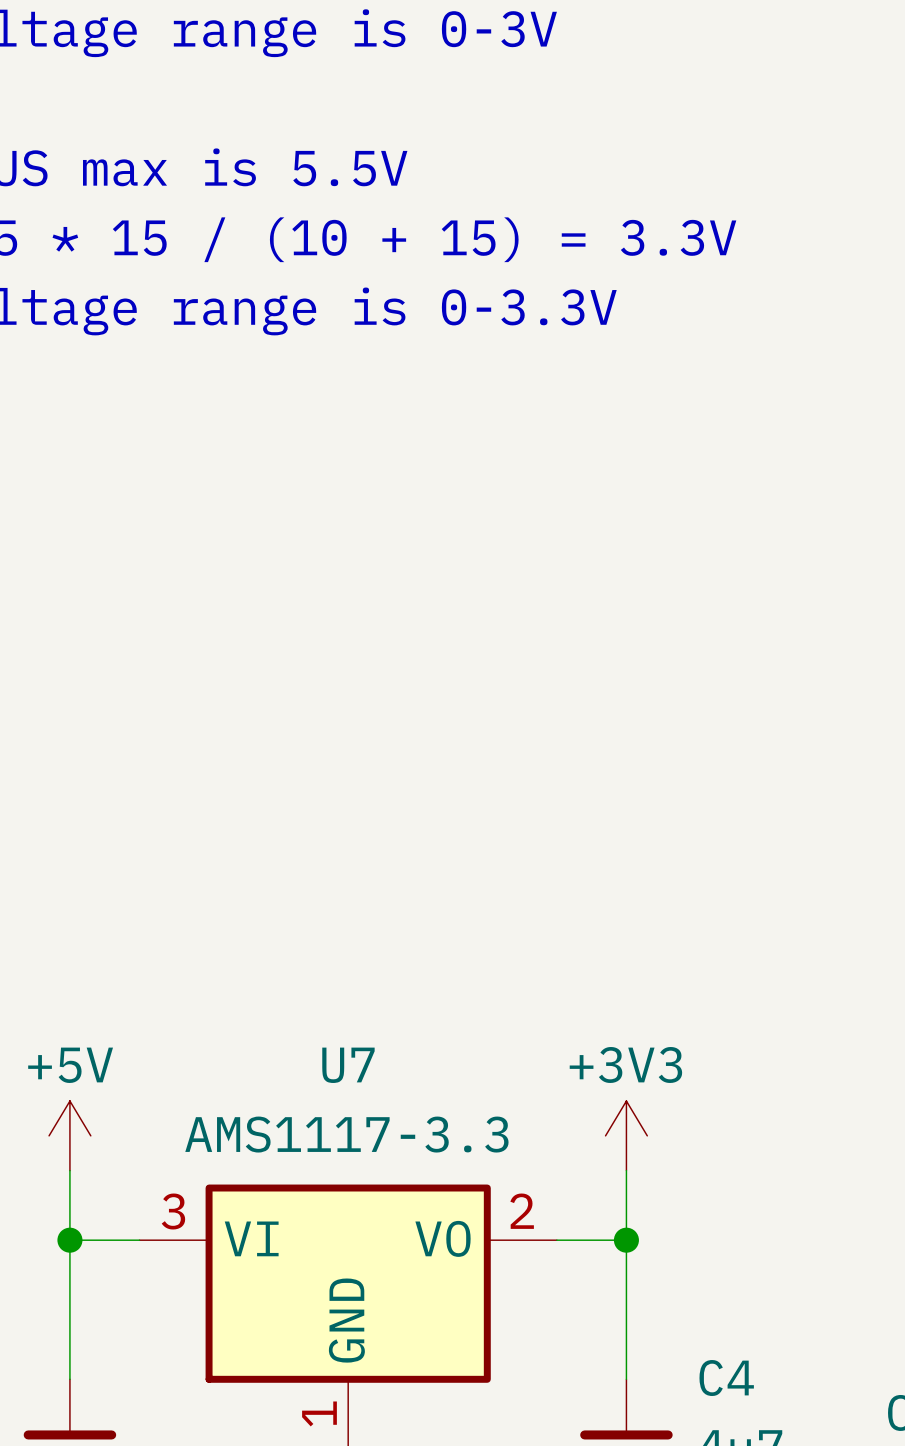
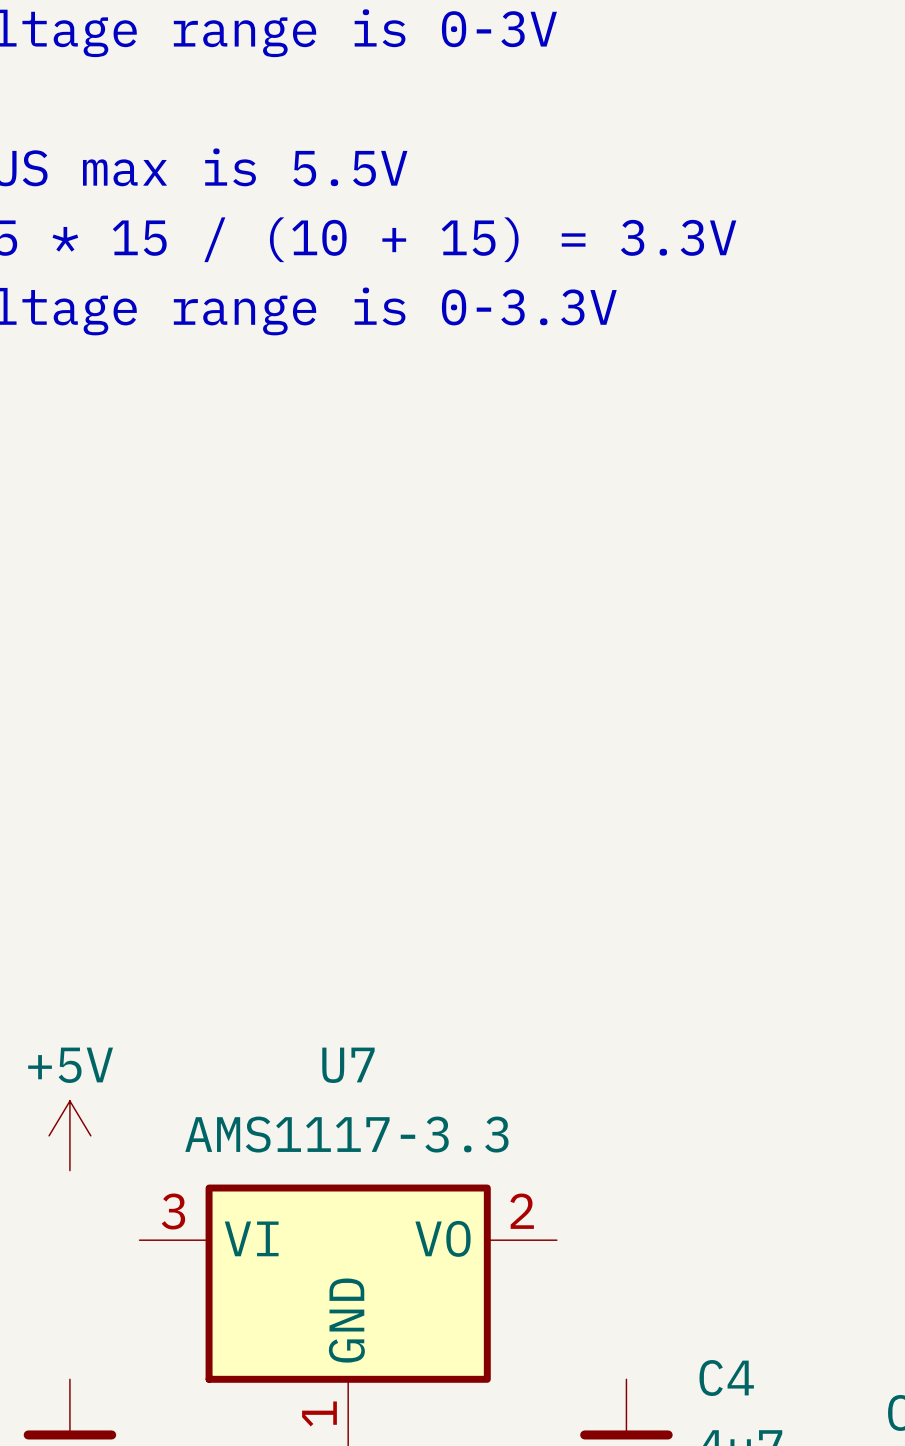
power symbol: +3V3 (626, 1135) -> none
wire: (69, 1170) (69, 1379) -> none
wire: (626, 1170) (626, 1379) -> none
wire: (69, 1240) (139, 1240) -> none
junction: (69, 1240) -> none
wire: (556, 1240) (626, 1240) -> none
junction: (626, 1240) -> none

